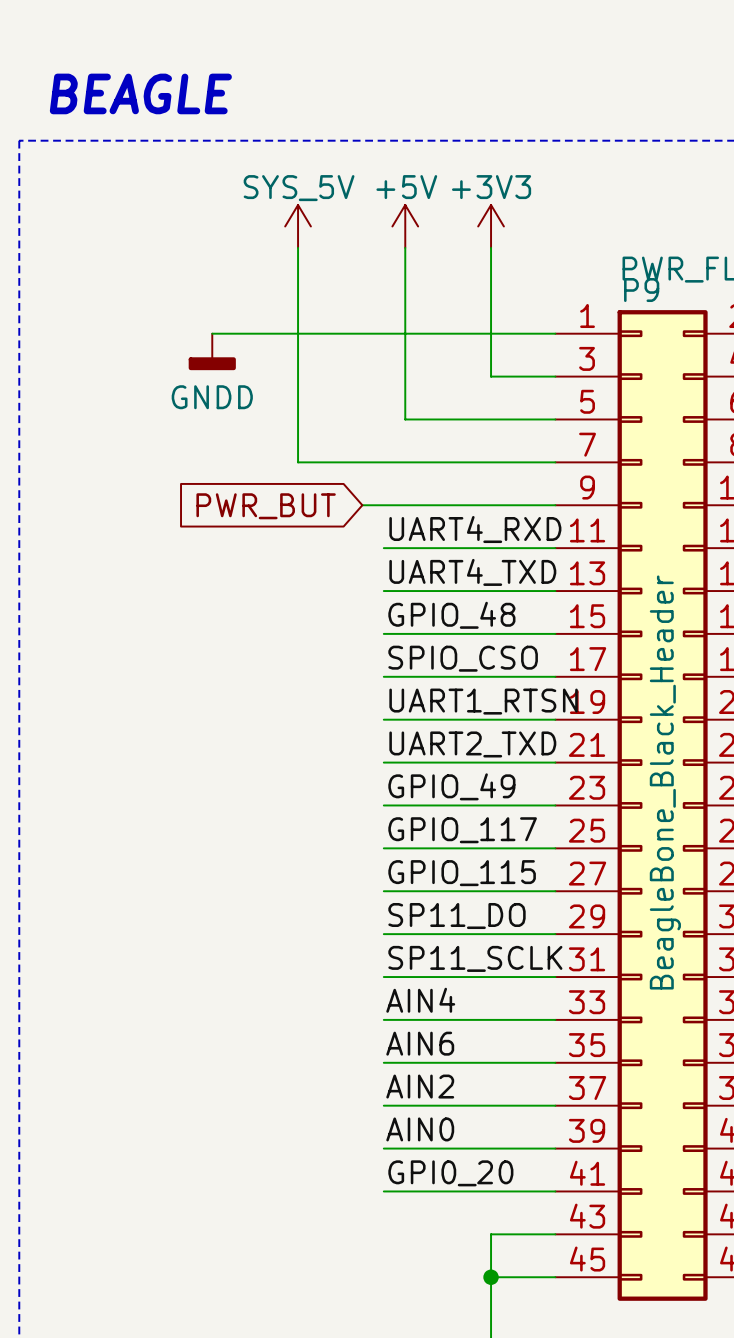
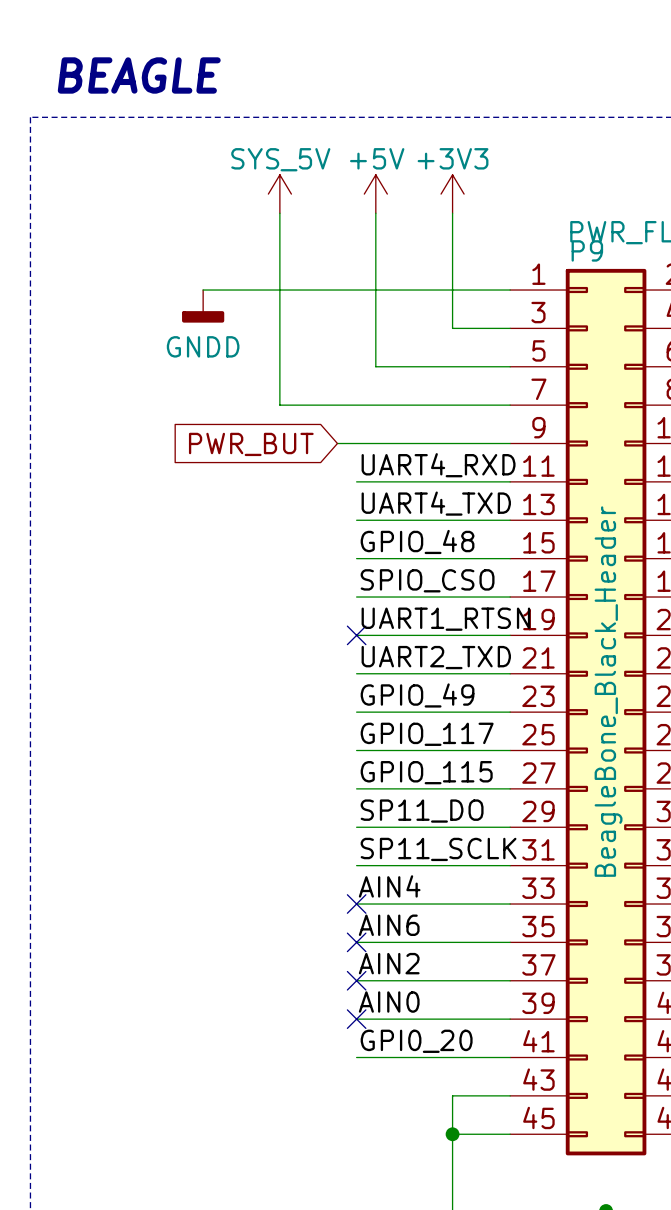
no-connect mark: none -> (356, 635)
no-connect mark: none -> (356, 904)
no-connect mark: none -> (356, 942)
no-connect mark: none -> (356, 980)
no-connect mark: none -> (356, 1019)

